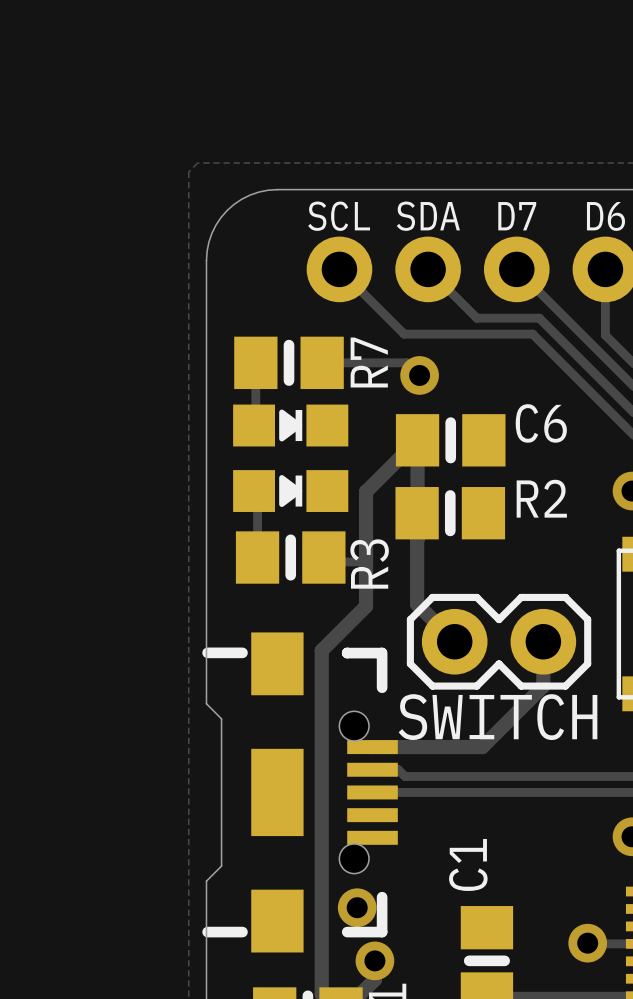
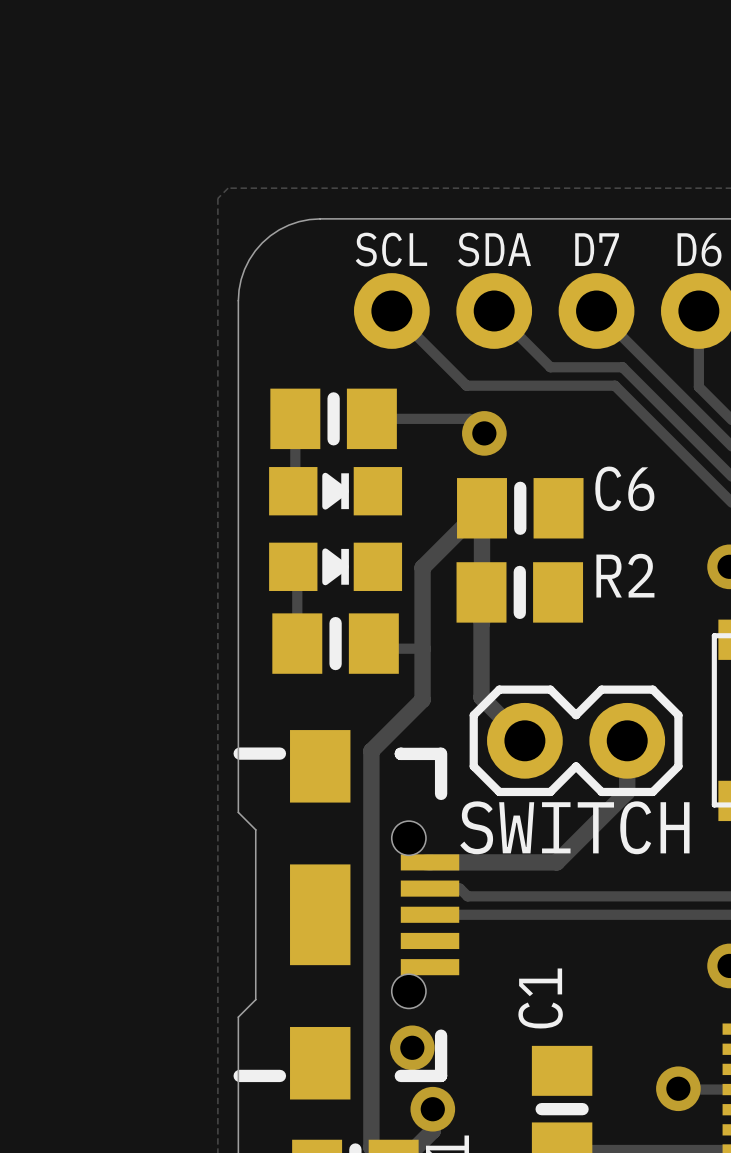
R7 name: R7 (369, 362) -> none
R3 name: R3 (369, 563) -> none

